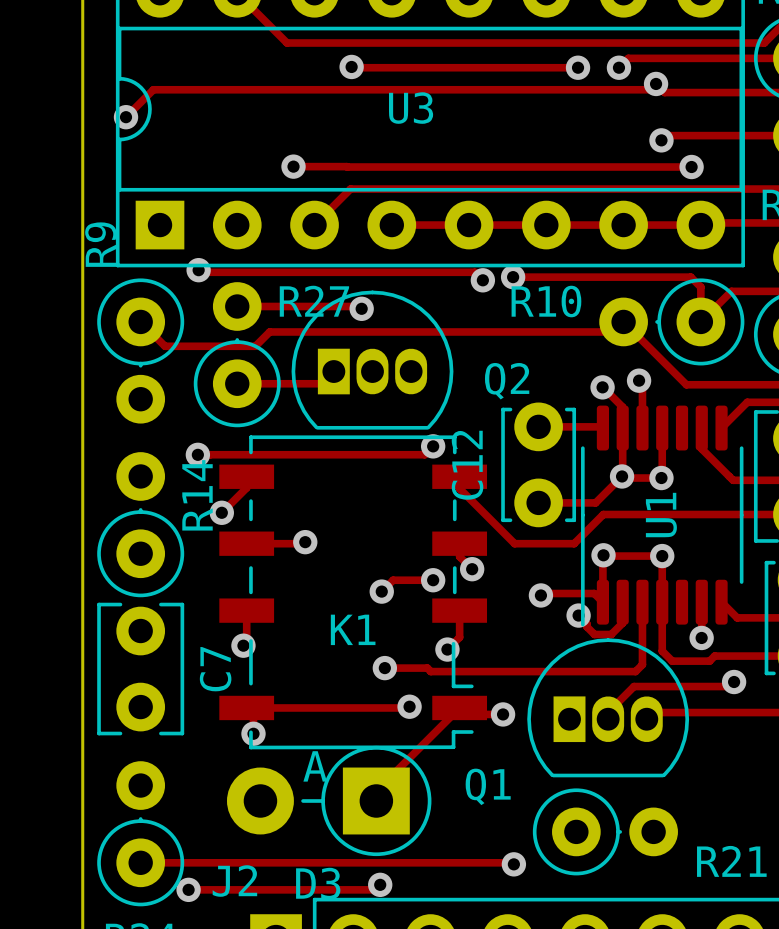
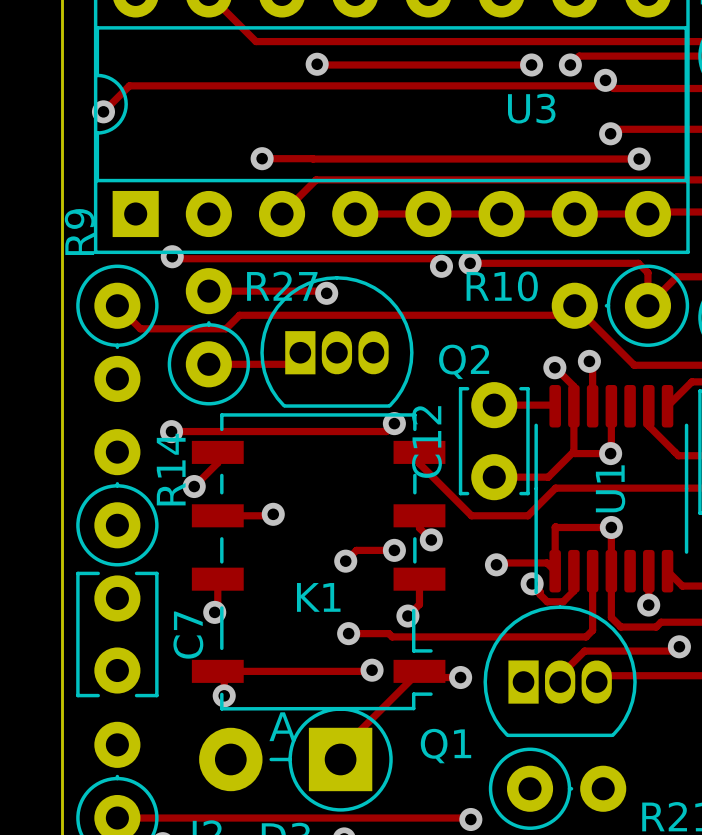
U3 name position: U3 (411, 108) -> U3 (531, 108)
via: (622, 476) -> none
via: (603, 555) -> none

